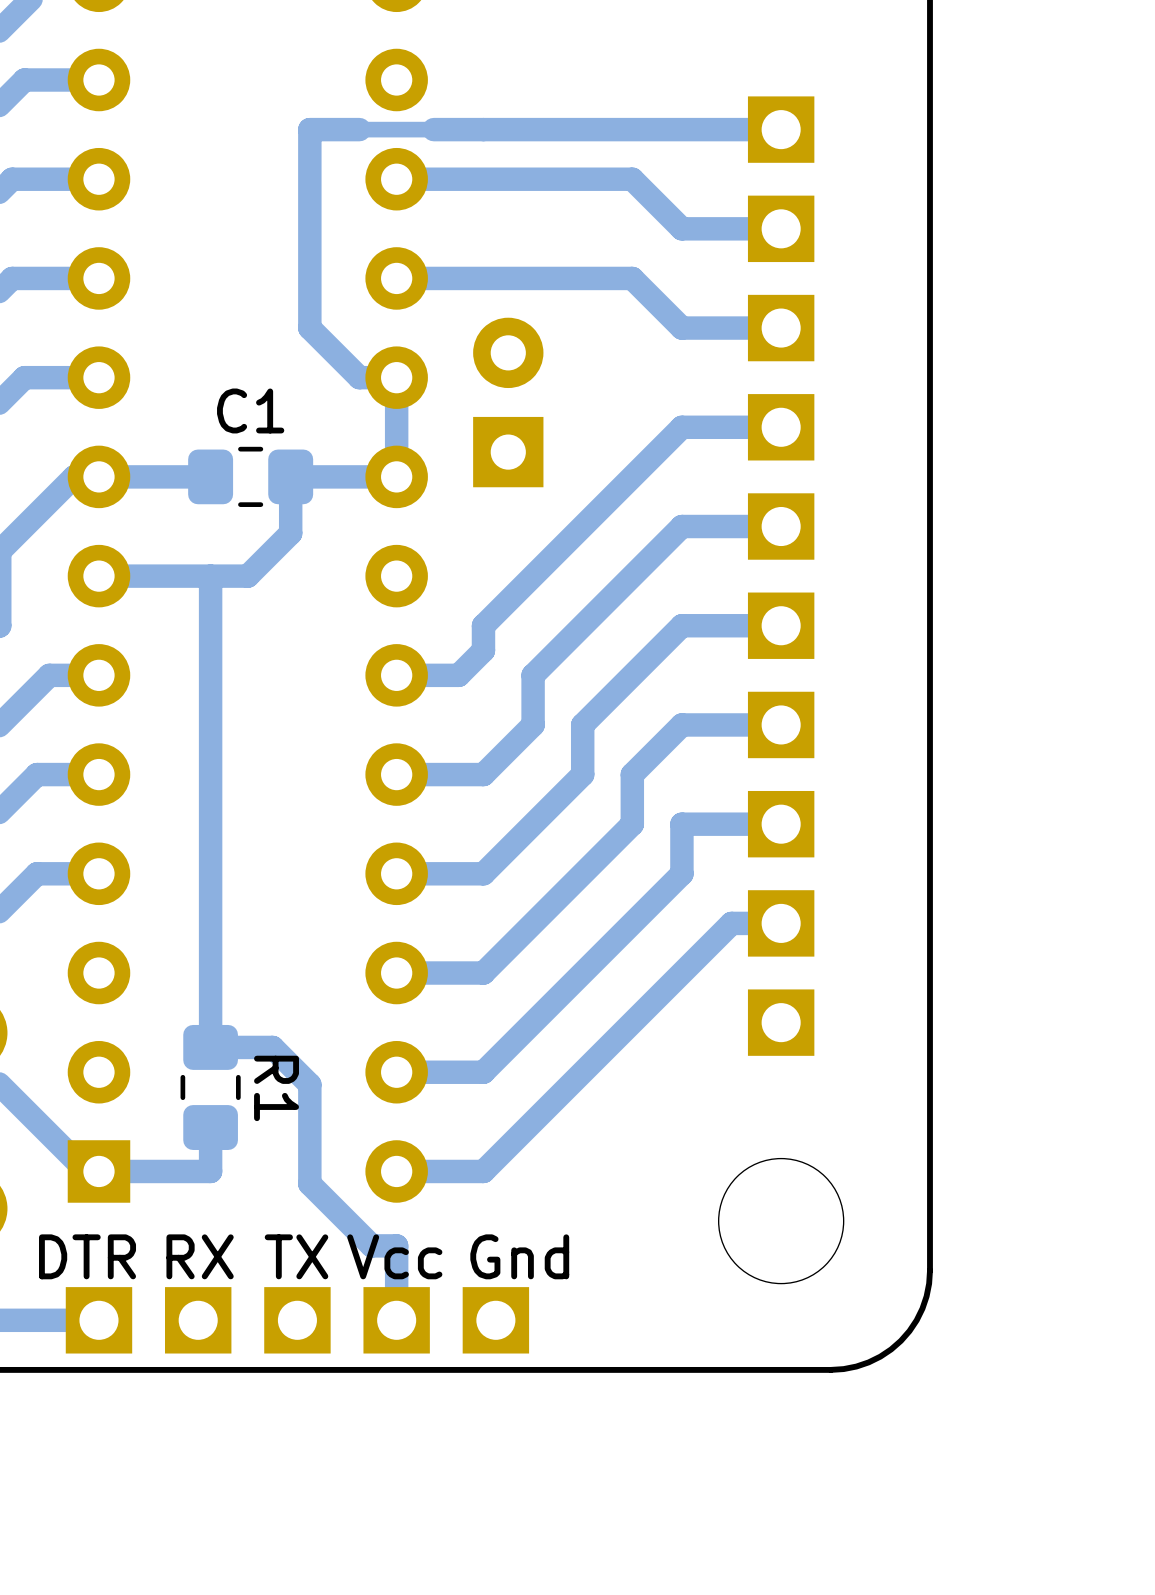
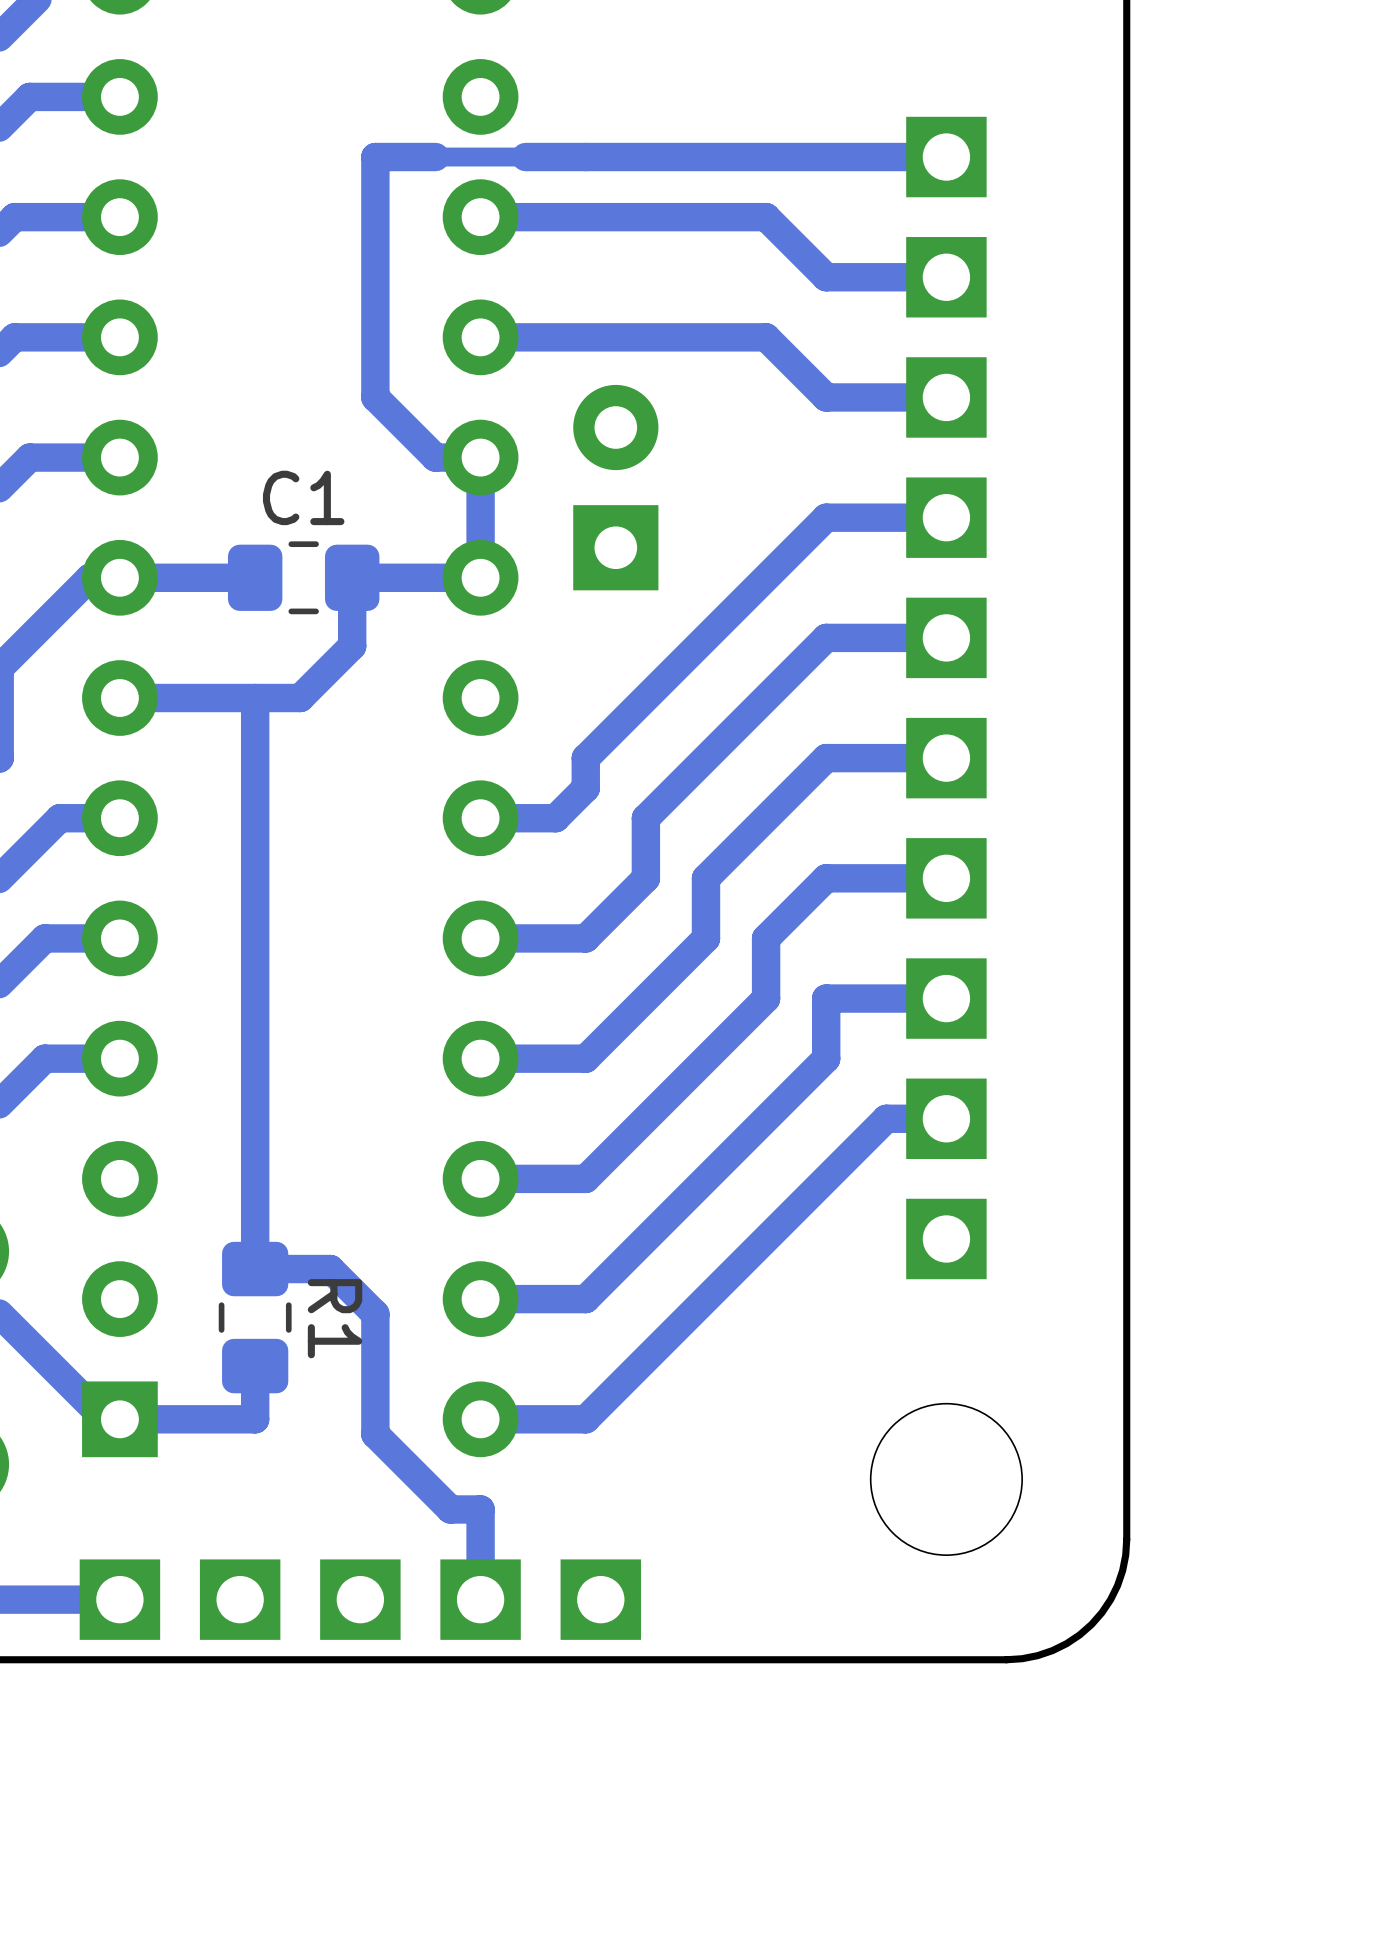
text: DTR (87, 1256) -> none
text: RX (200, 1256) -> none
text: TX (296, 1256) -> none
text: Vcc (394, 1256) -> none
text: Gnd (519, 1256) -> none

